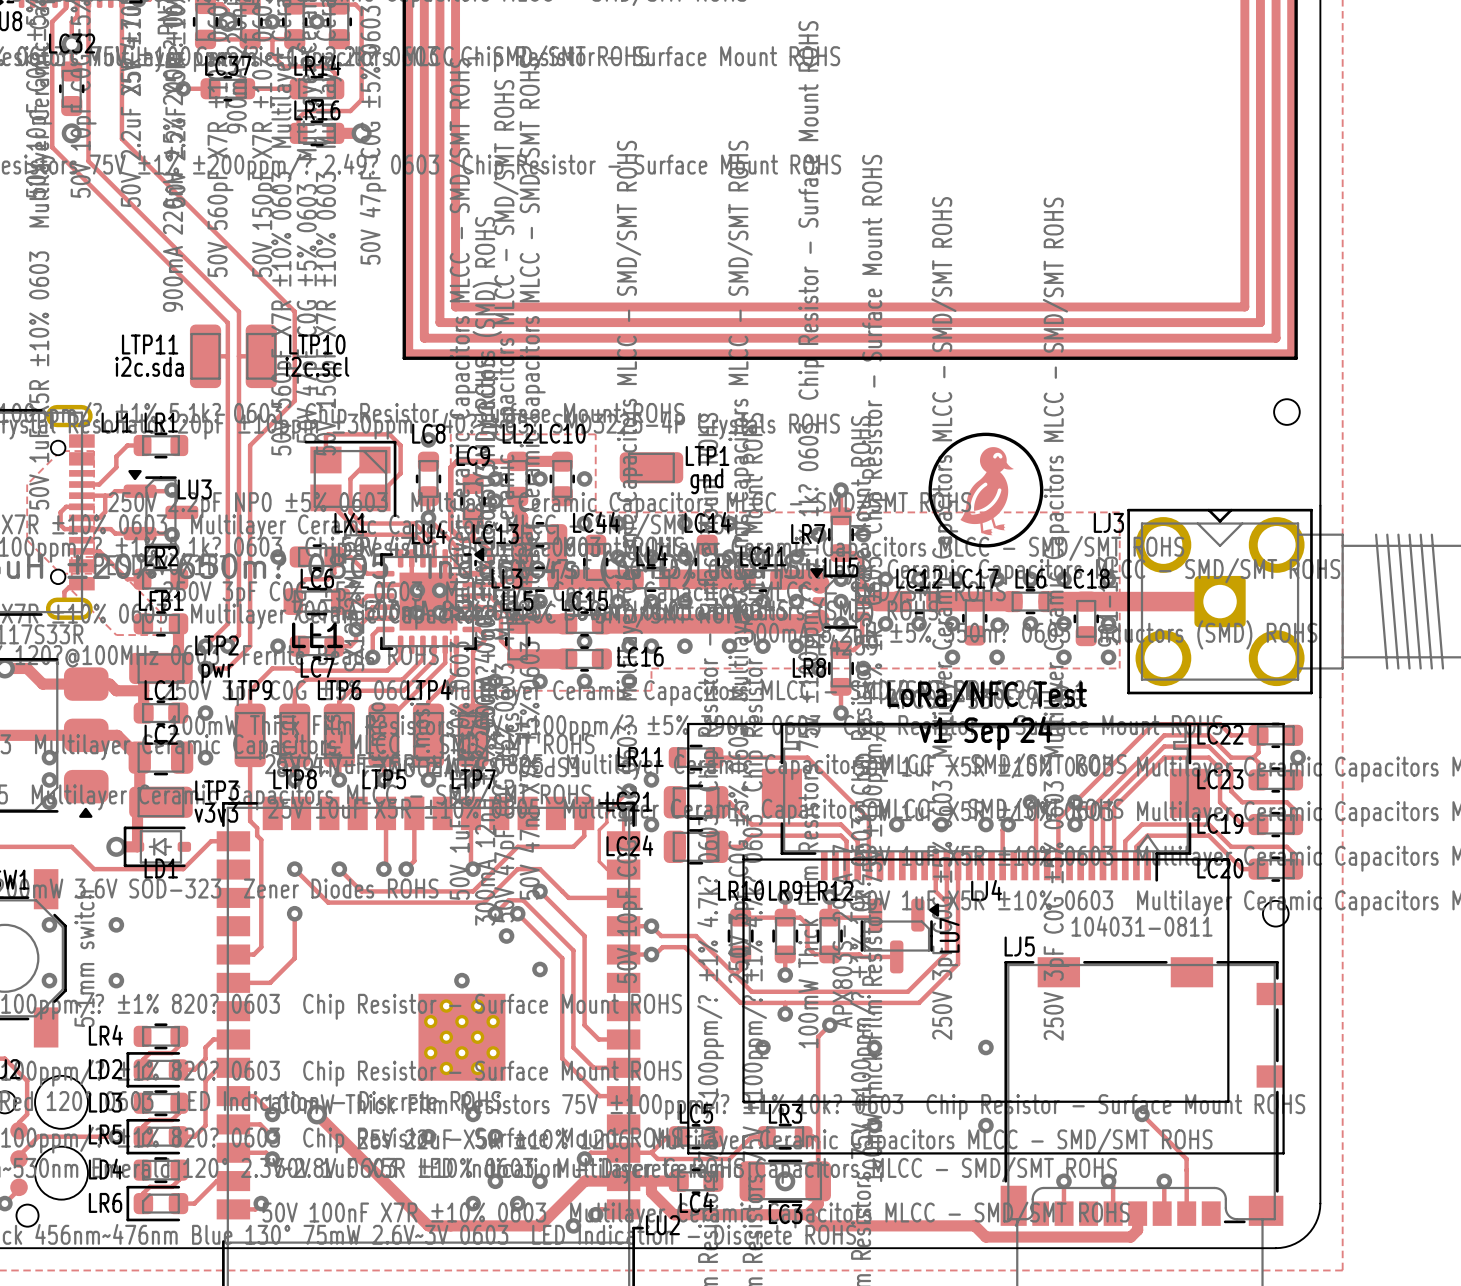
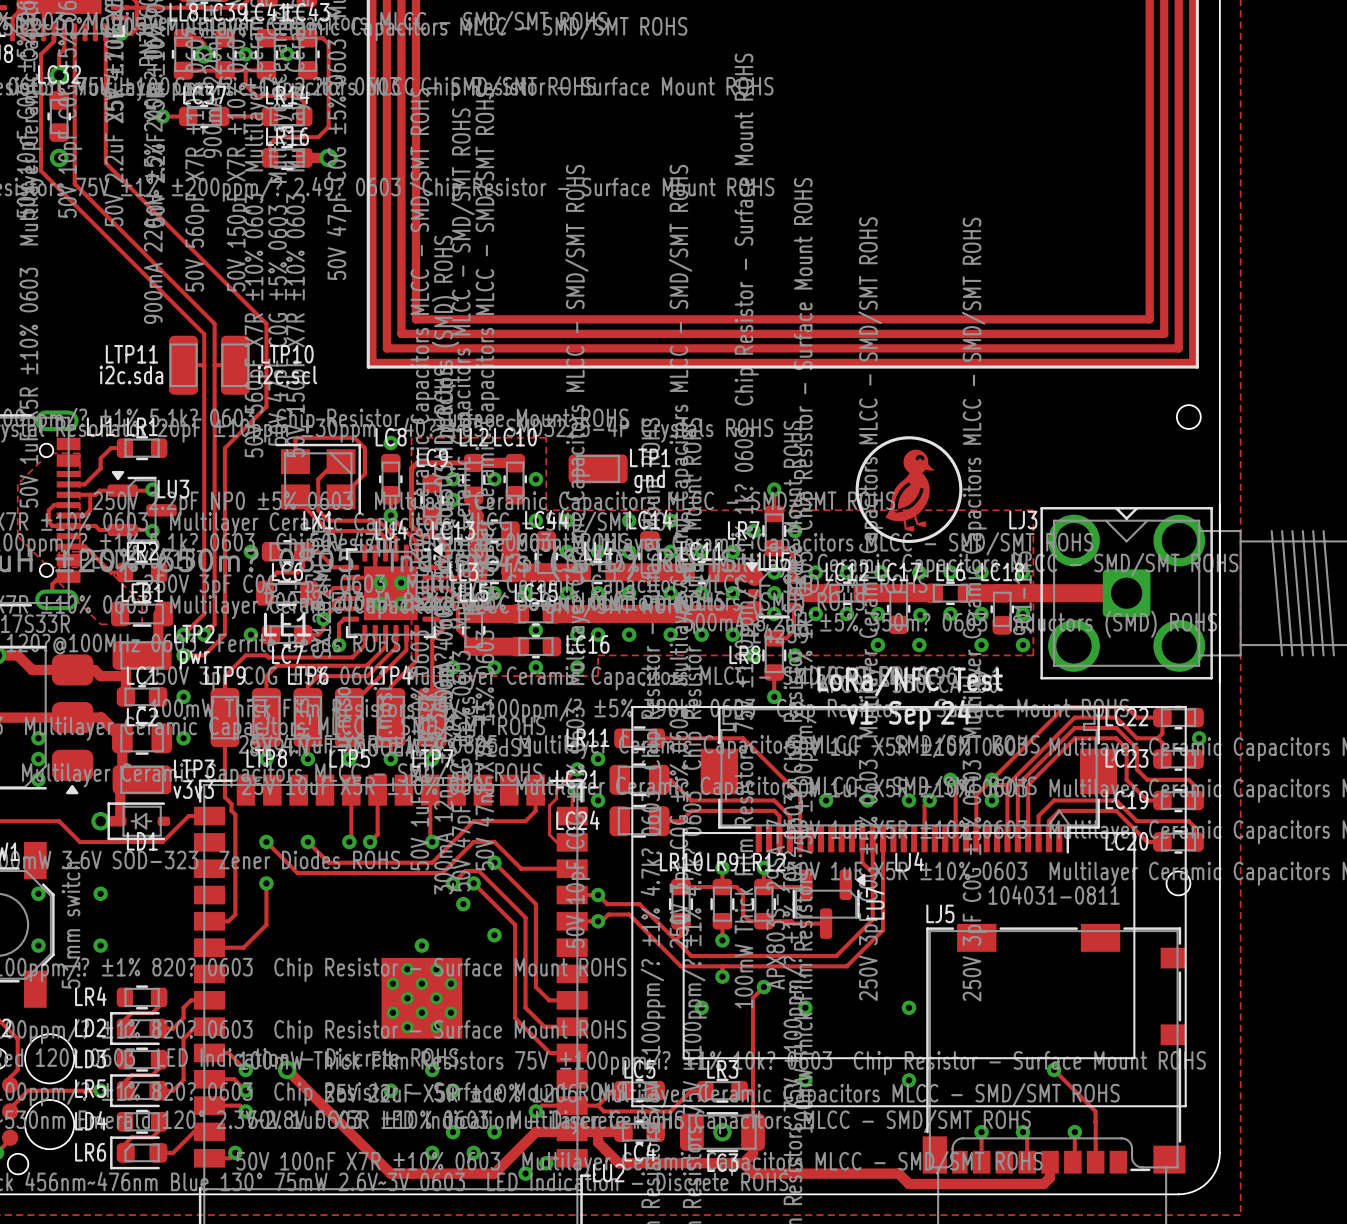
LFB1 footprint: [133, 611, 189, 637] -> [111, 601, 174, 627]

